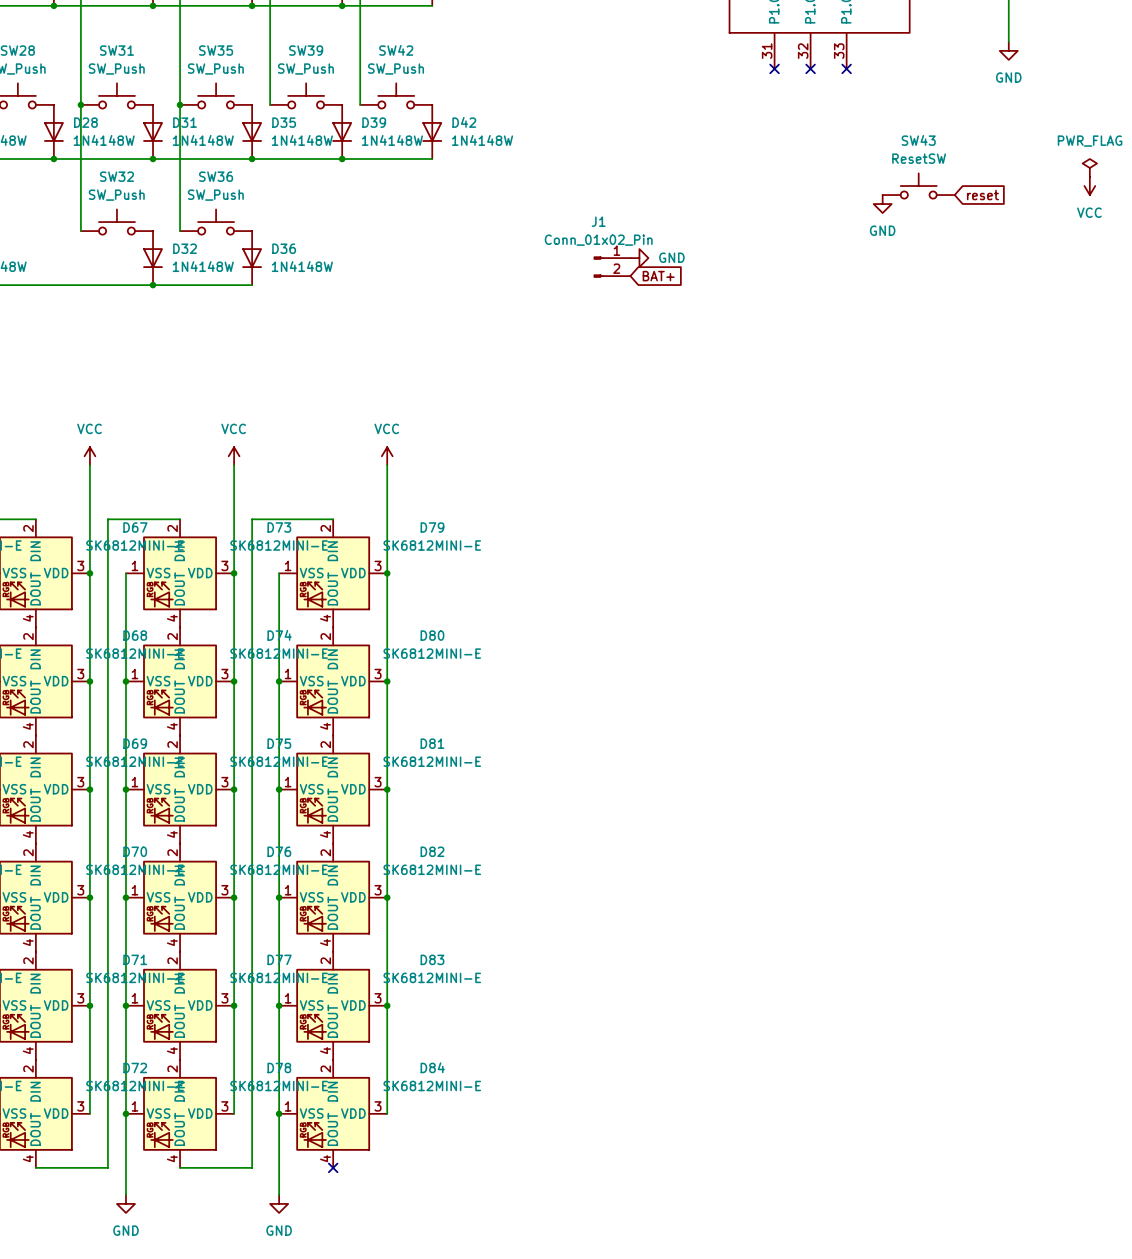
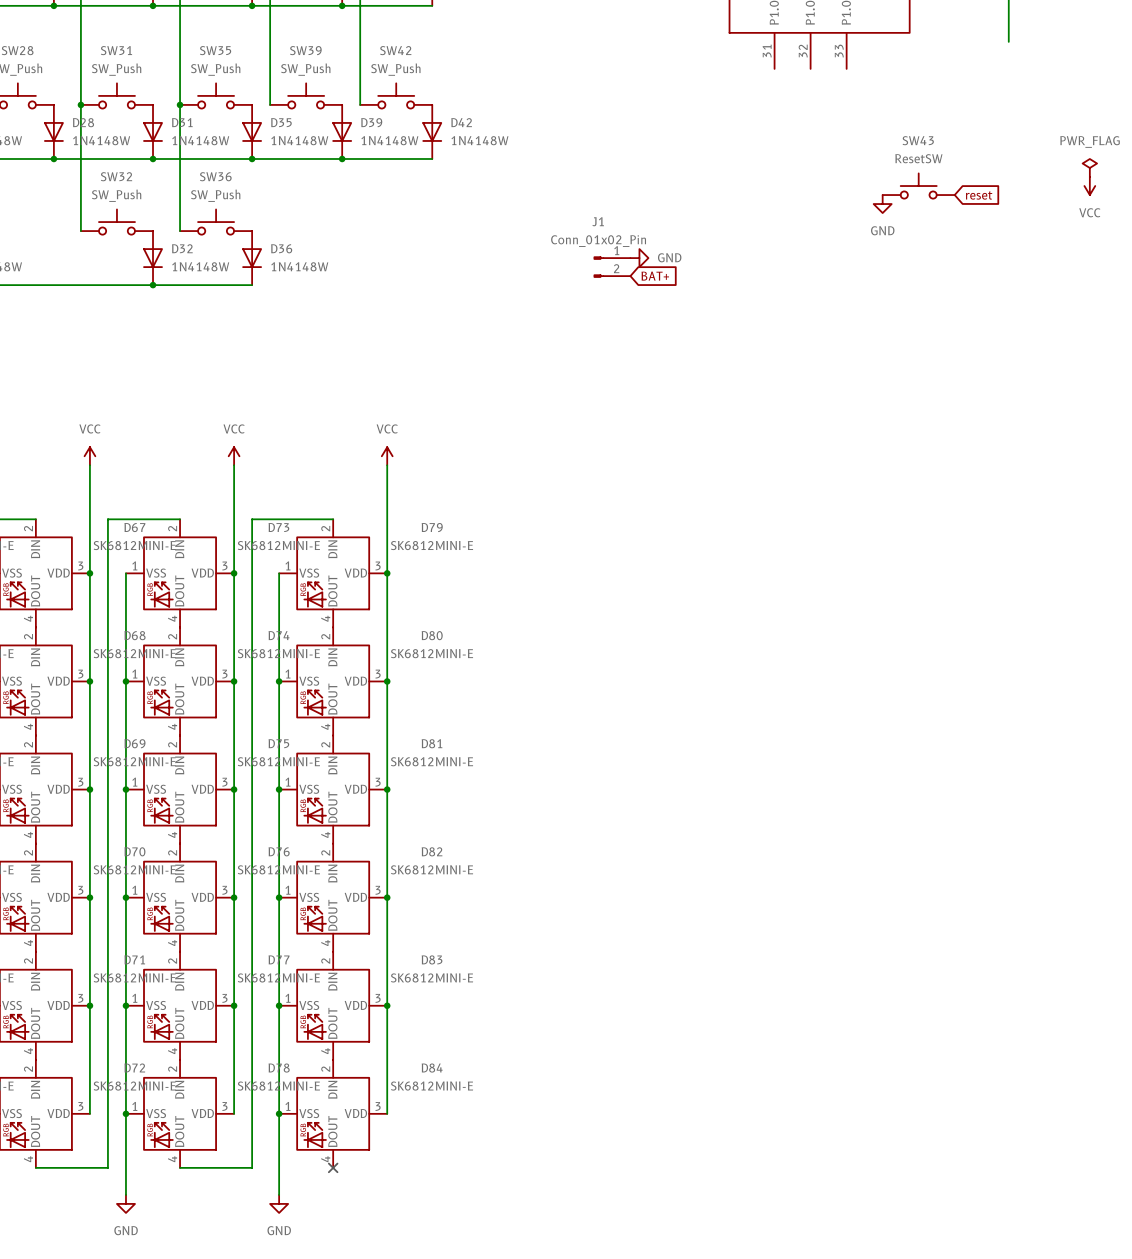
power symbol: GND (1008, 50) -> none
no-connect mark: (774, 68) -> none
no-connect mark: (810, 68) -> none
no-connect mark: (846, 68) -> none

